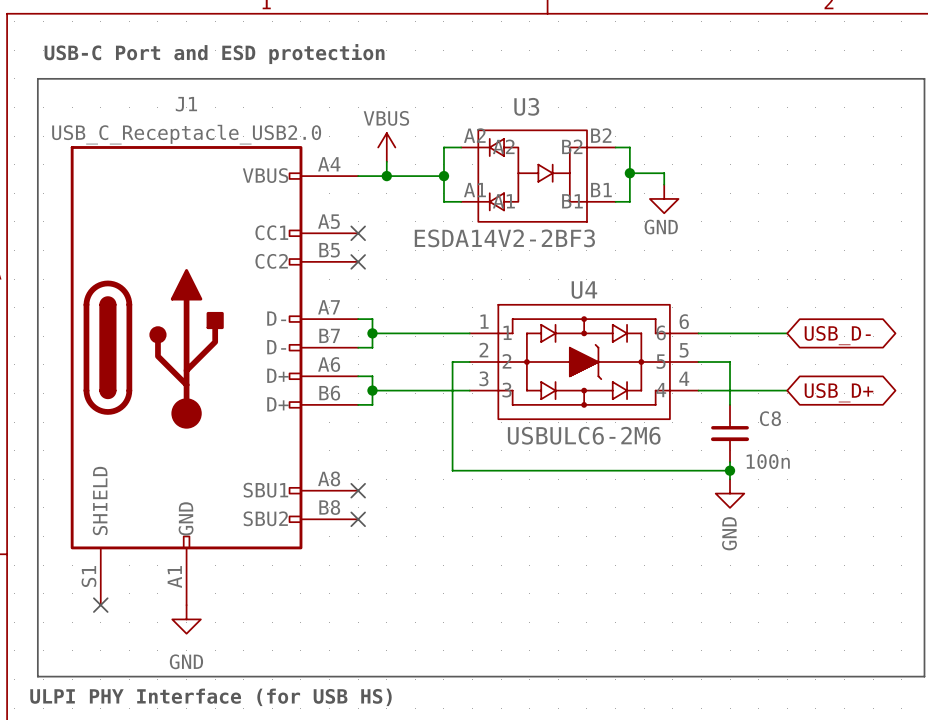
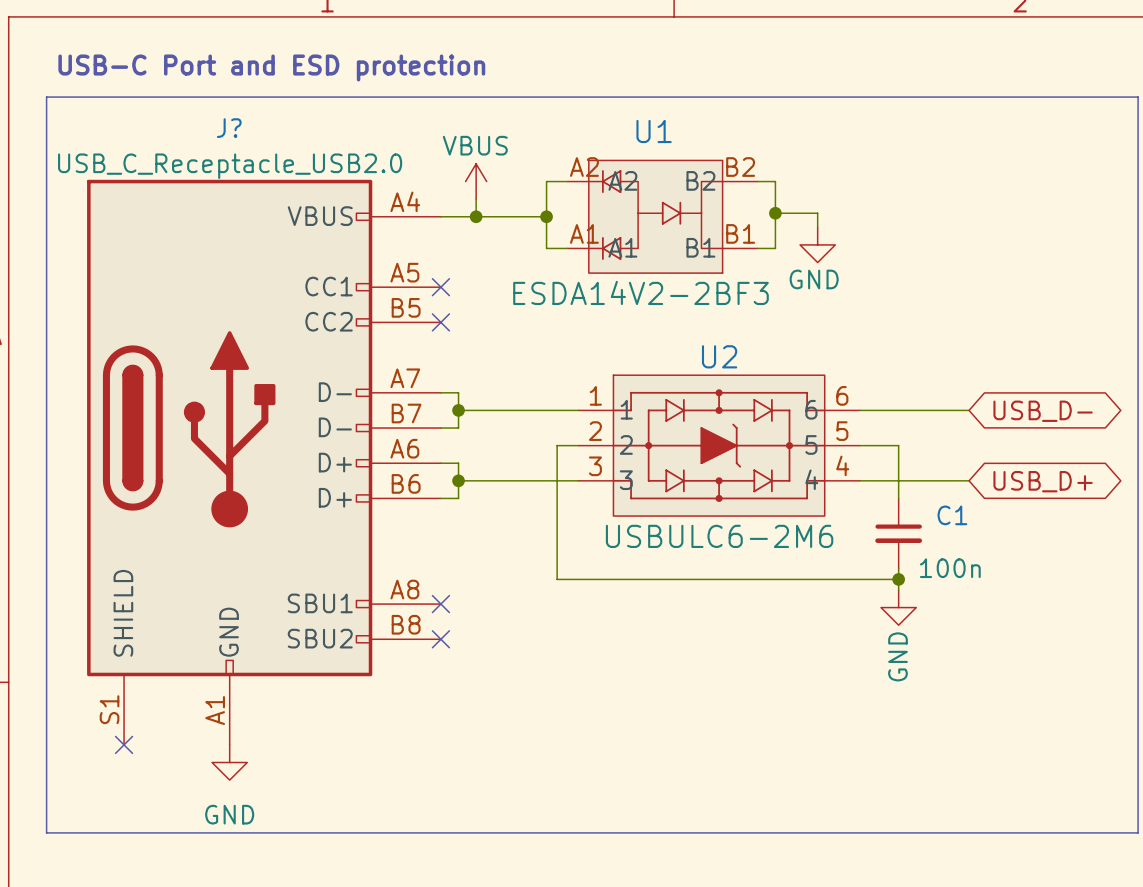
J1 name: J1 (186, 104) -> J? (229, 128)
U3 name: U3 (526, 106) -> U1 (654, 131)
U4 name: U4 (584, 290) -> U2 (719, 356)
C8 name: C8 (770, 418) -> C1 (952, 515)
text: ULPI PHY Interface (for USB HS) (210, 697) -> none

